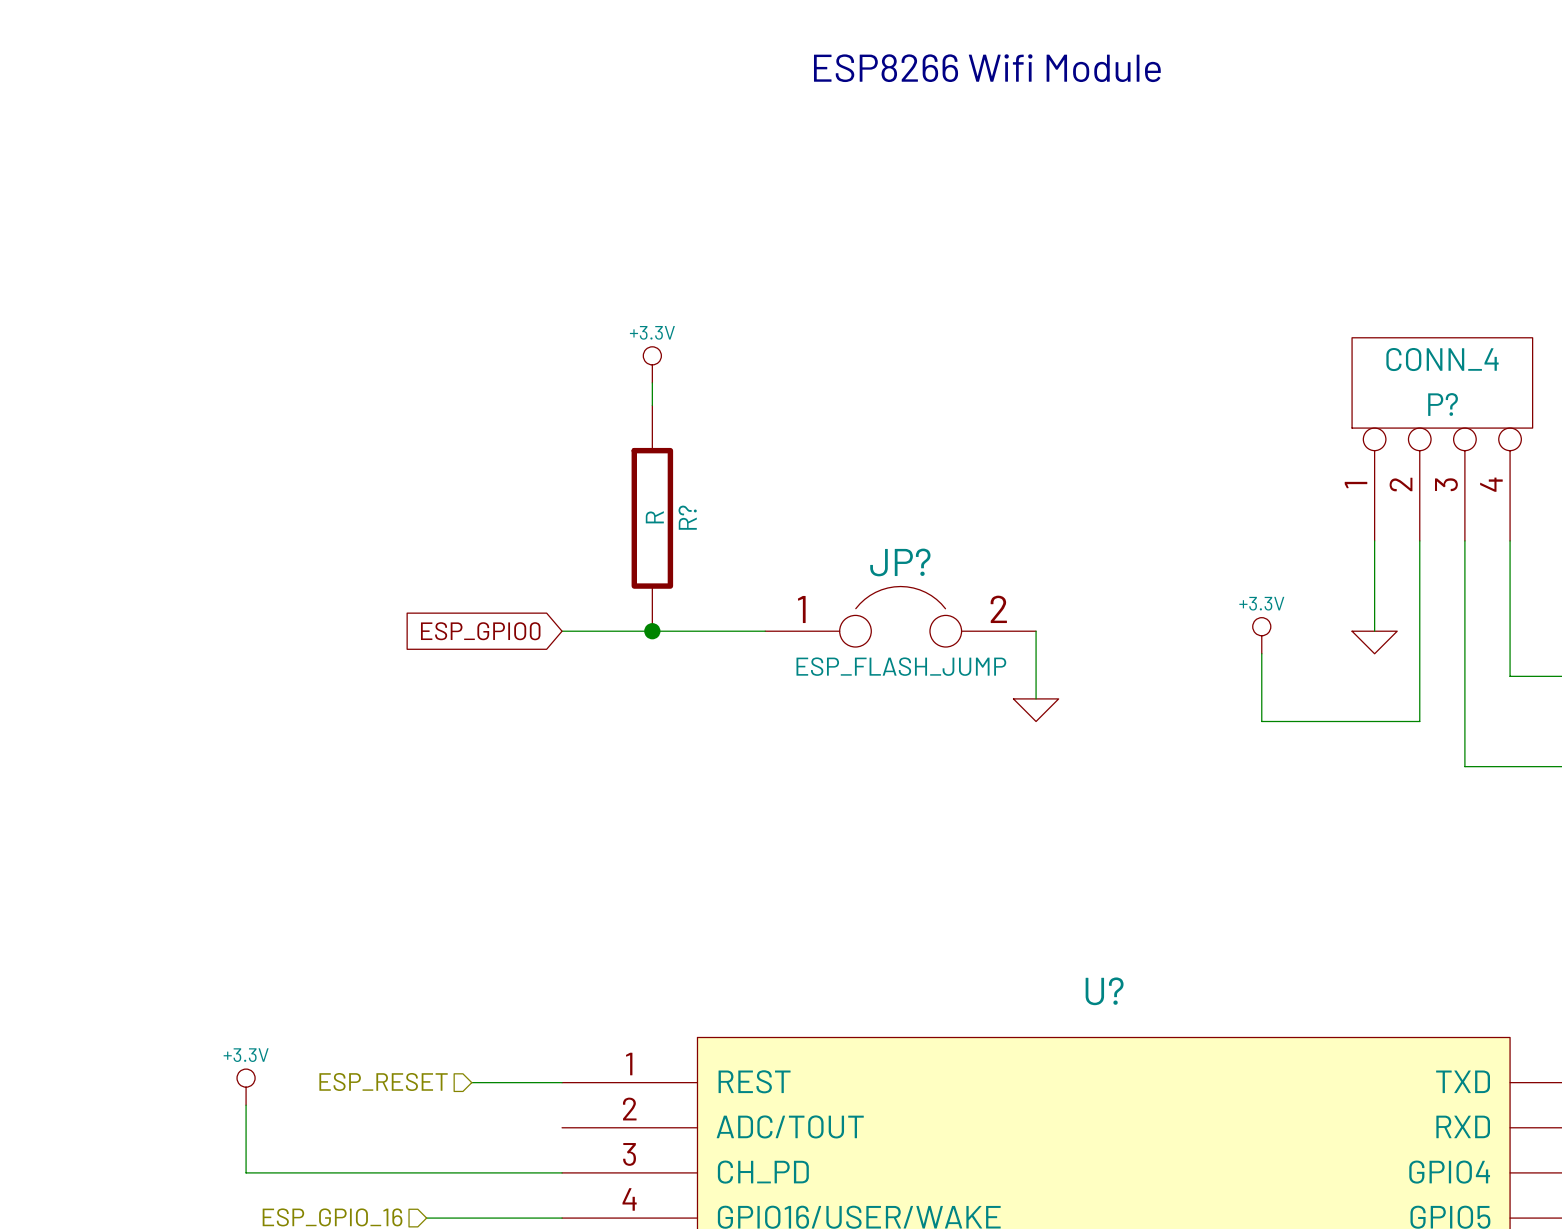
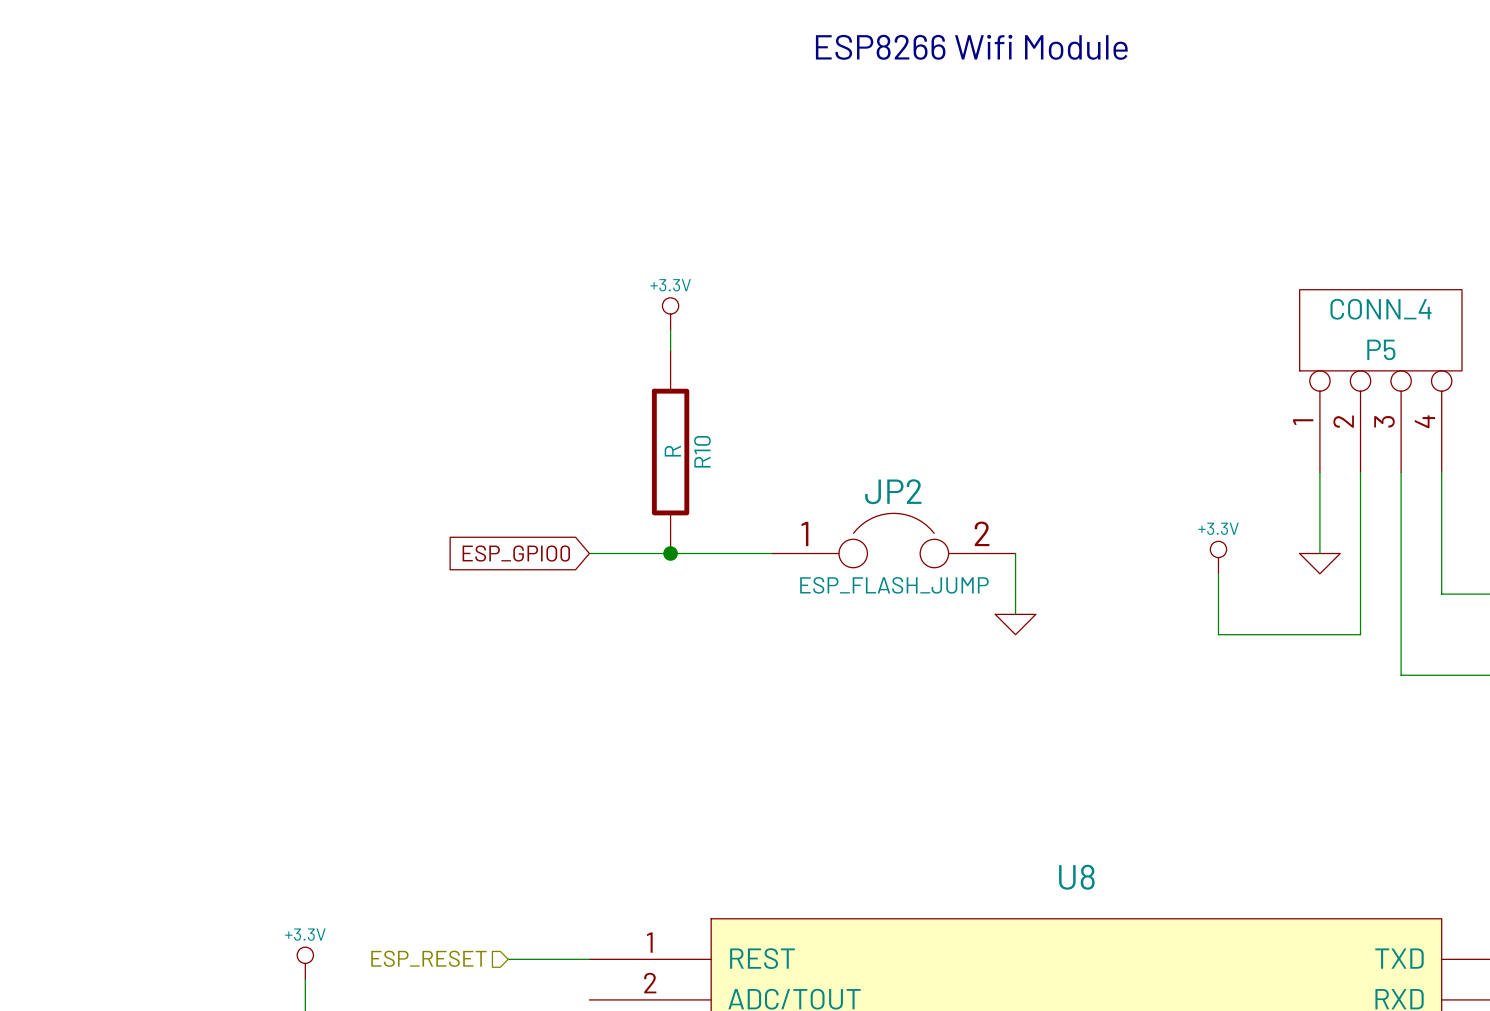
P? name: P? (1443, 404) -> P5 (1381, 349)
R? name: R? (687, 517) -> R10 (702, 451)
JP? name: JP? (900, 562) -> JP2 (893, 491)
U? name: U? (1104, 991) -> U8 (1076, 877)

